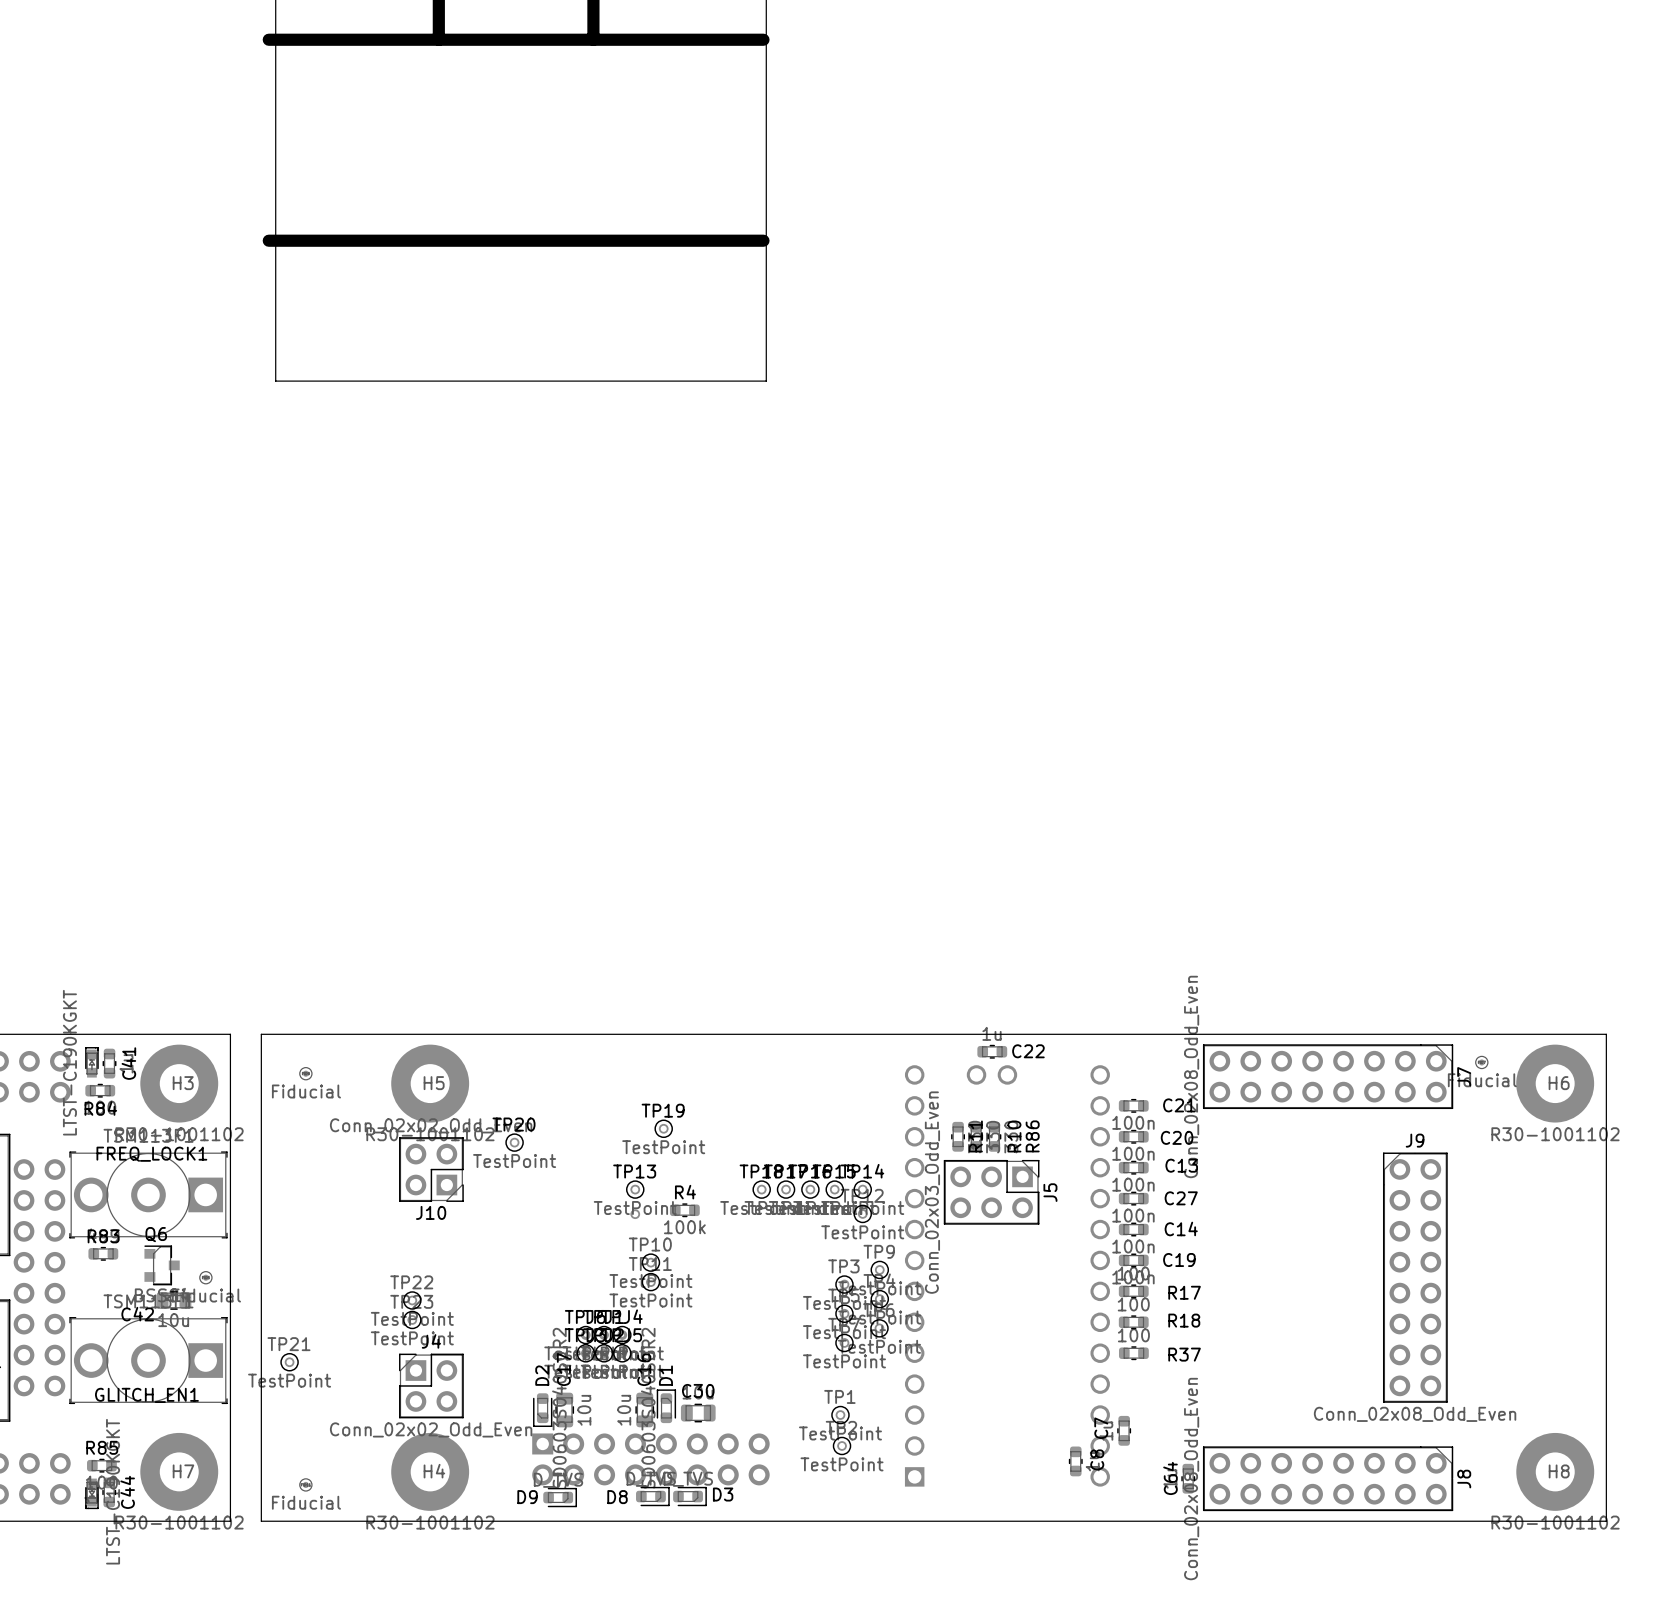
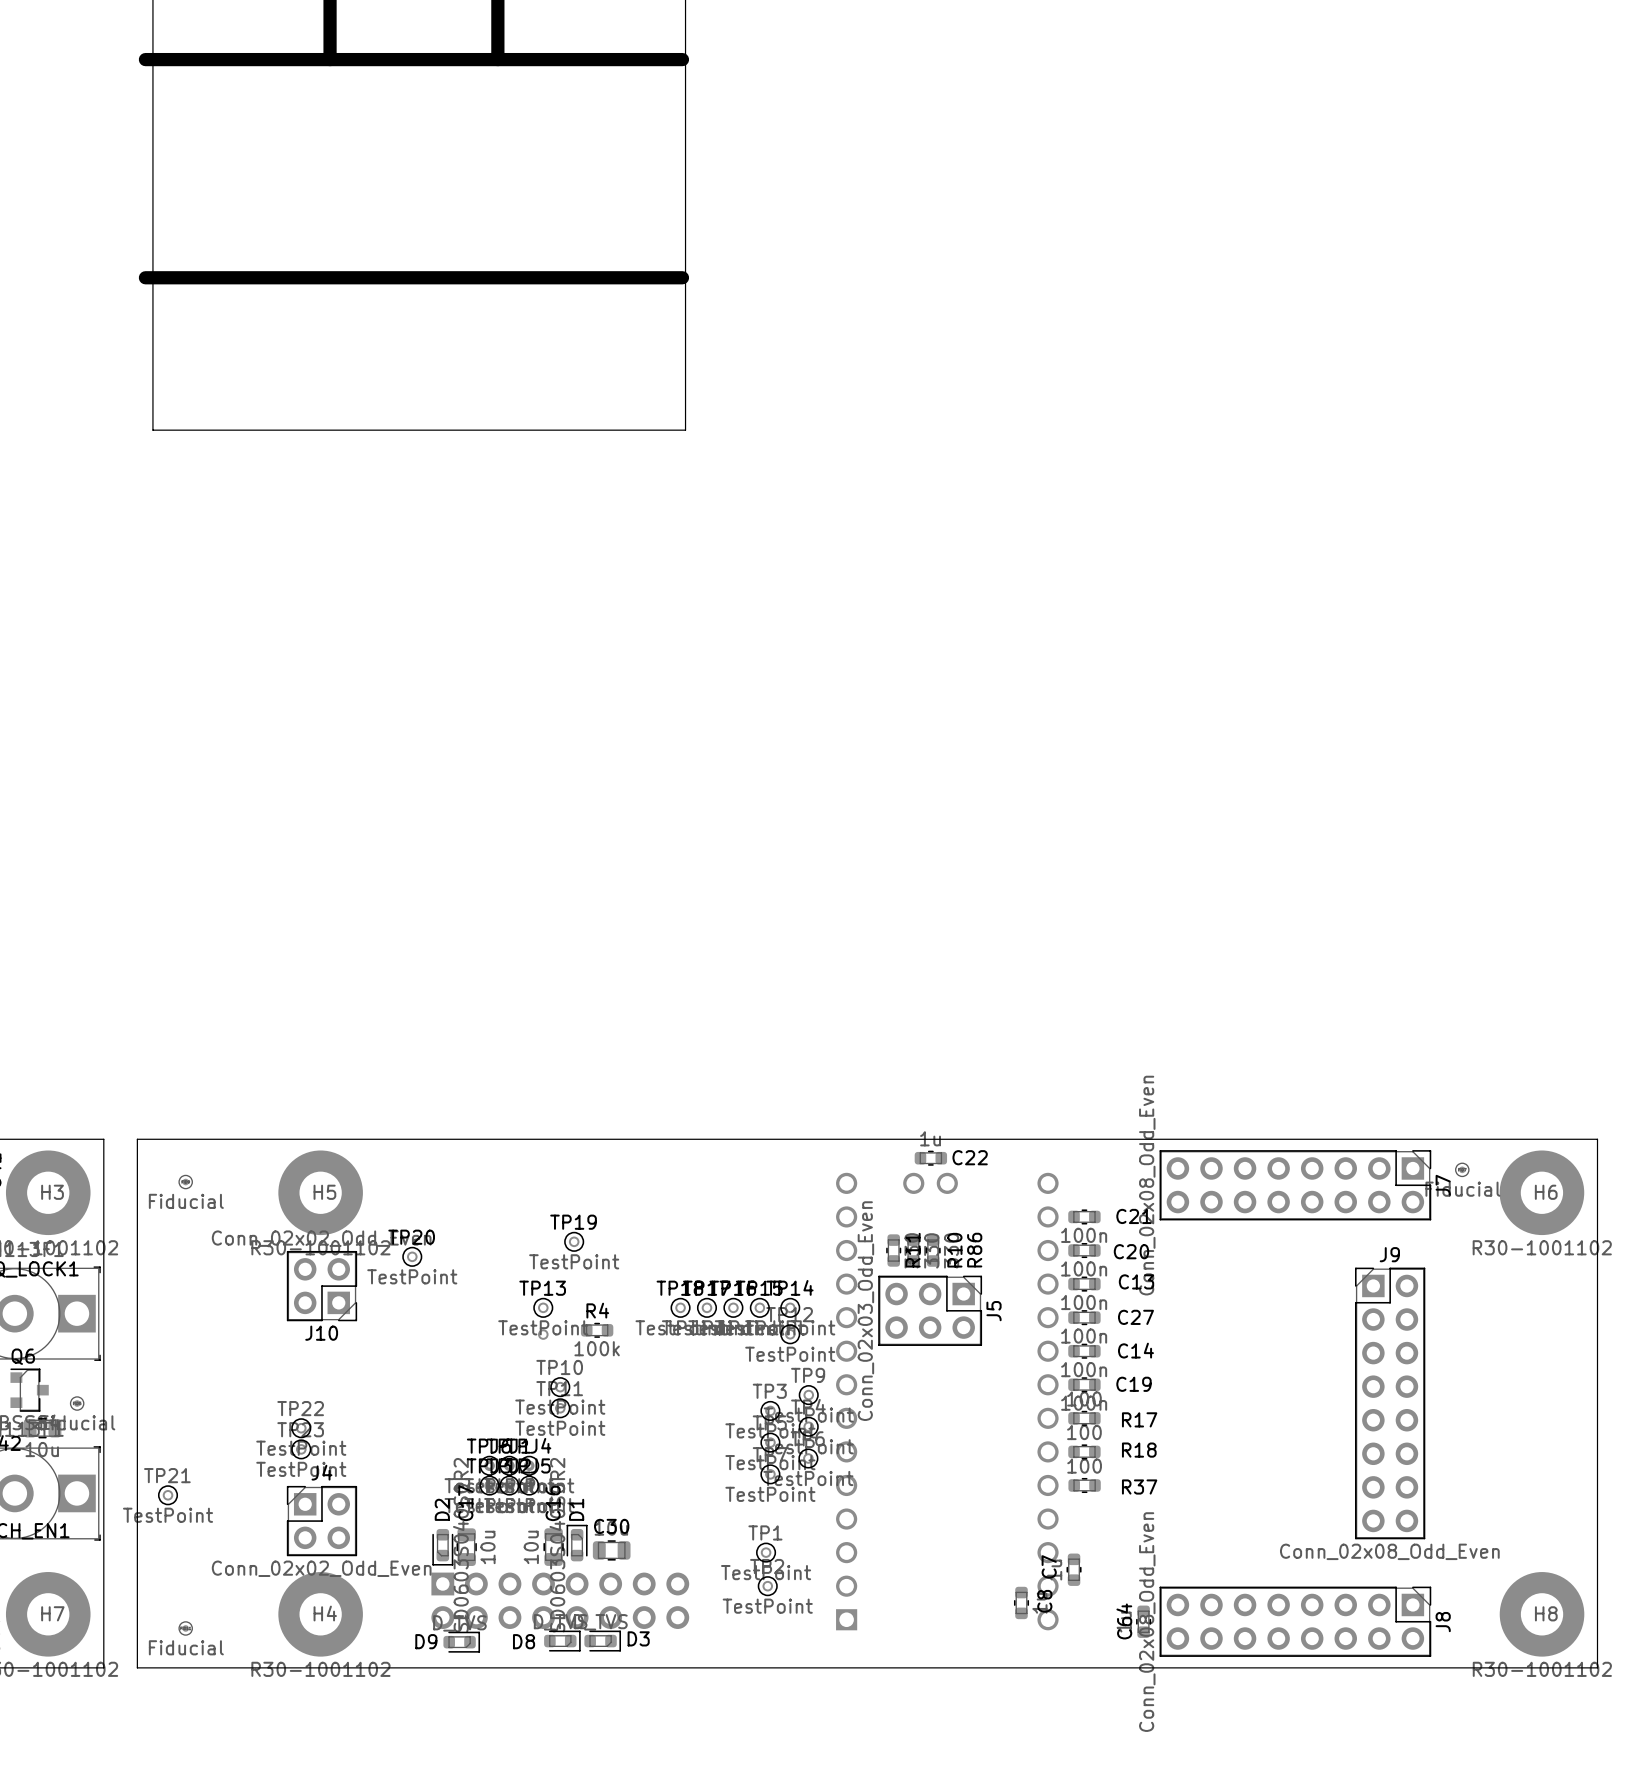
J7 footprint: [1202, 1044, 1454, 1110] -> [1159, 1150, 1432, 1221]
J9 footprint: [1382, 1152, 1448, 1403] -> [1355, 1267, 1426, 1540]
J8 footprint: [1202, 1446, 1454, 1512] -> [1159, 1586, 1432, 1657]

